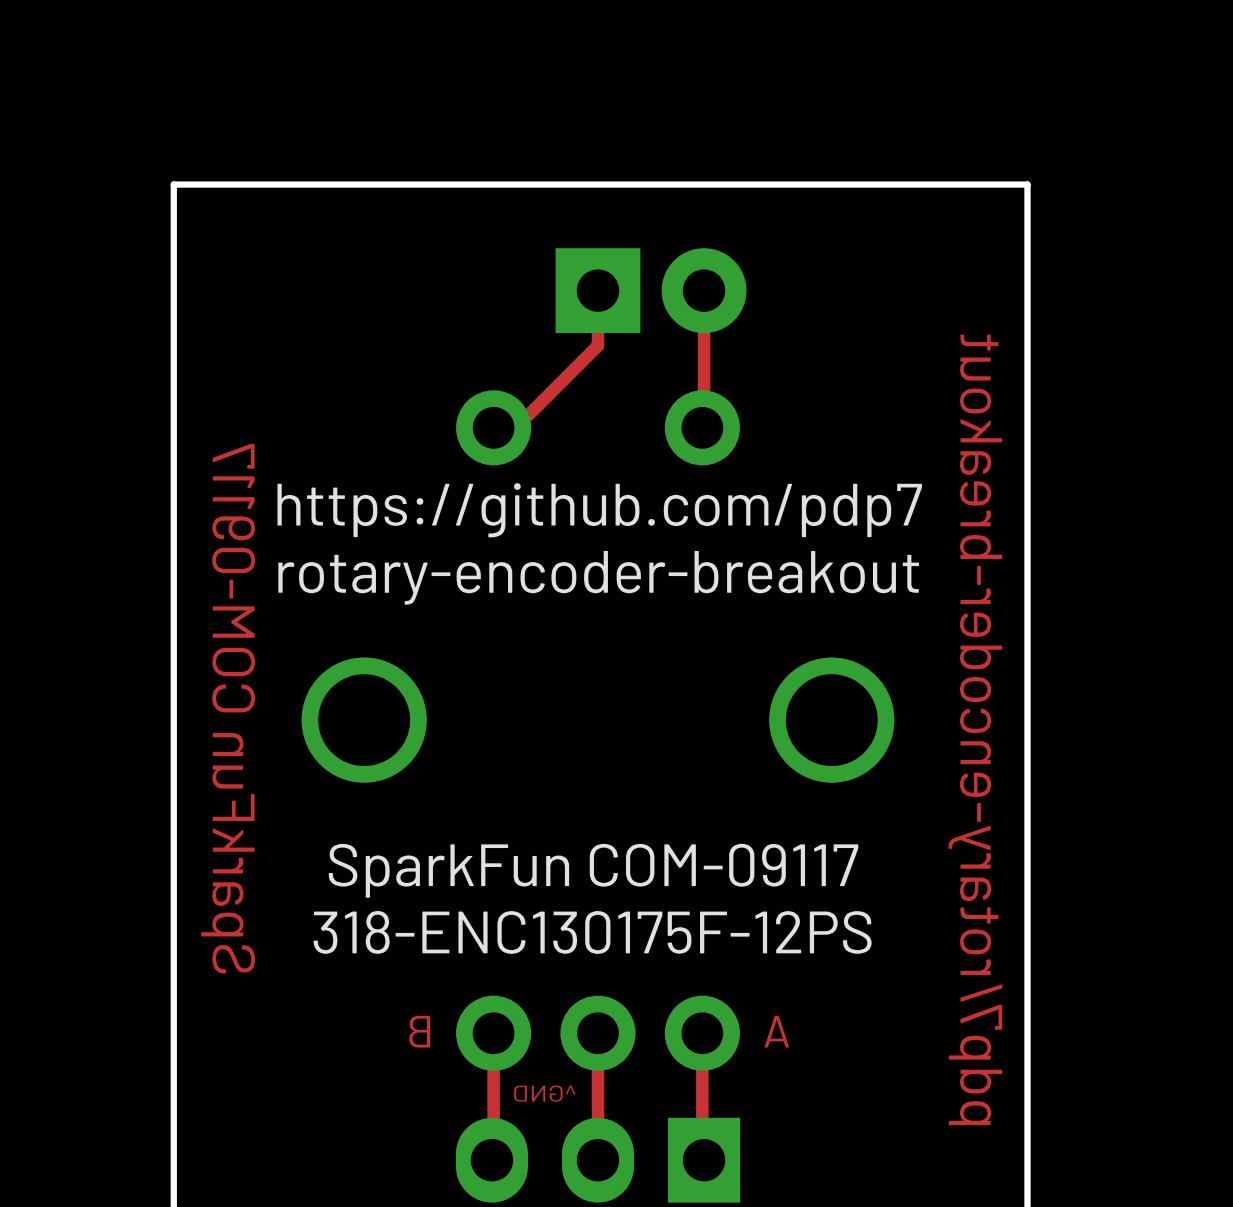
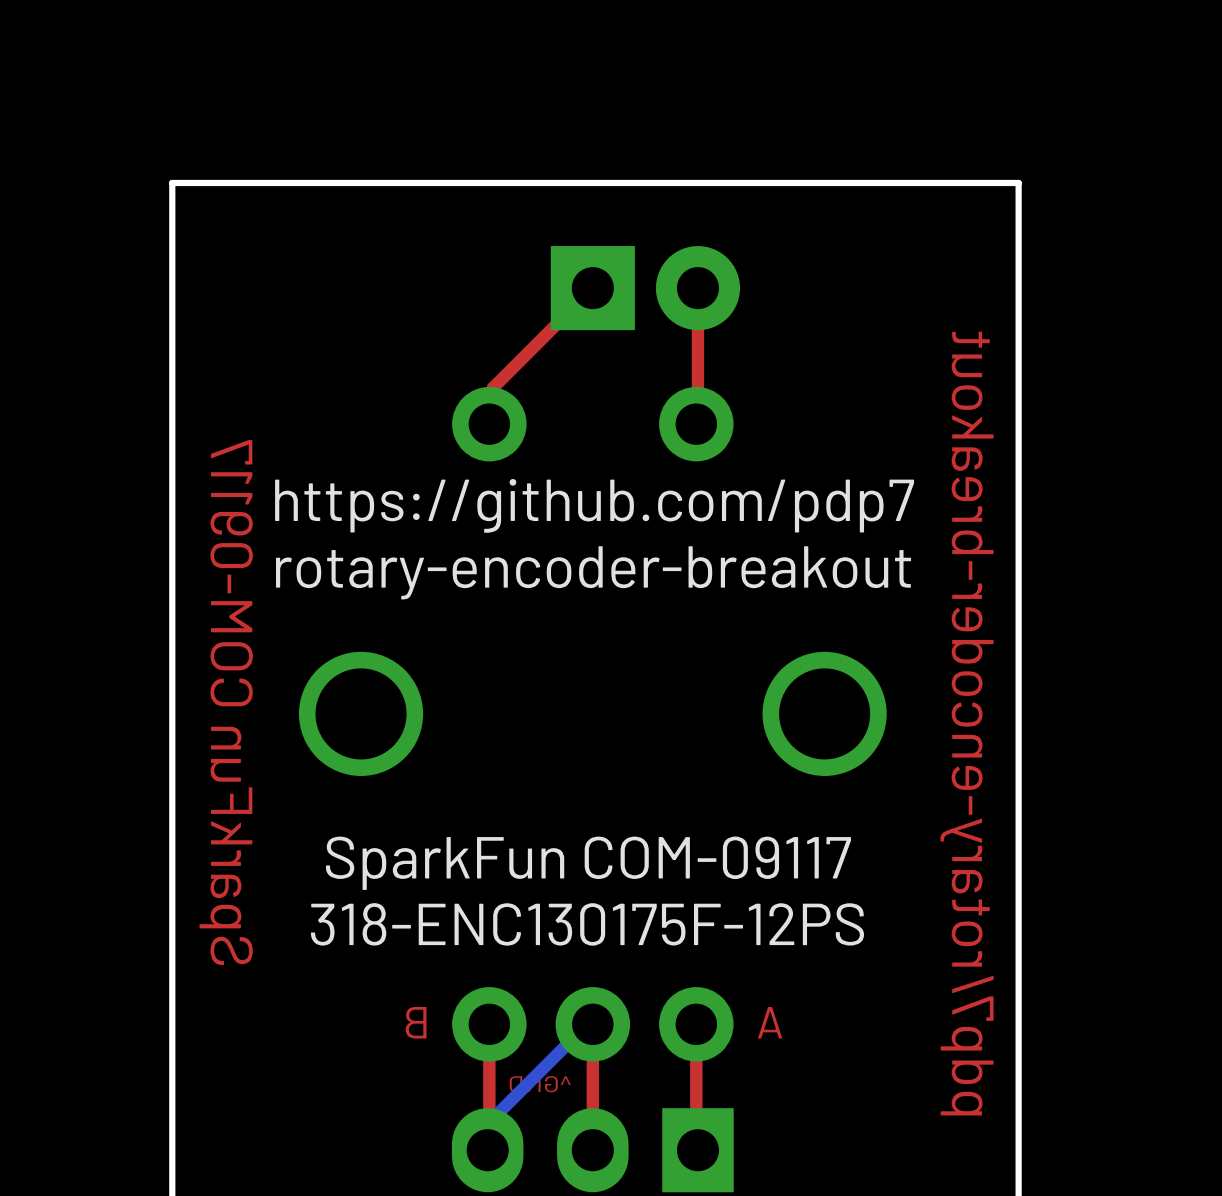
top track: (597, 290) (597, 345) (515, 427) (493, 427) -> (592, 288) (492, 387) (493, 415)
bottom track: none -> (597, 1015) (598, 1013) (487, 1123)

